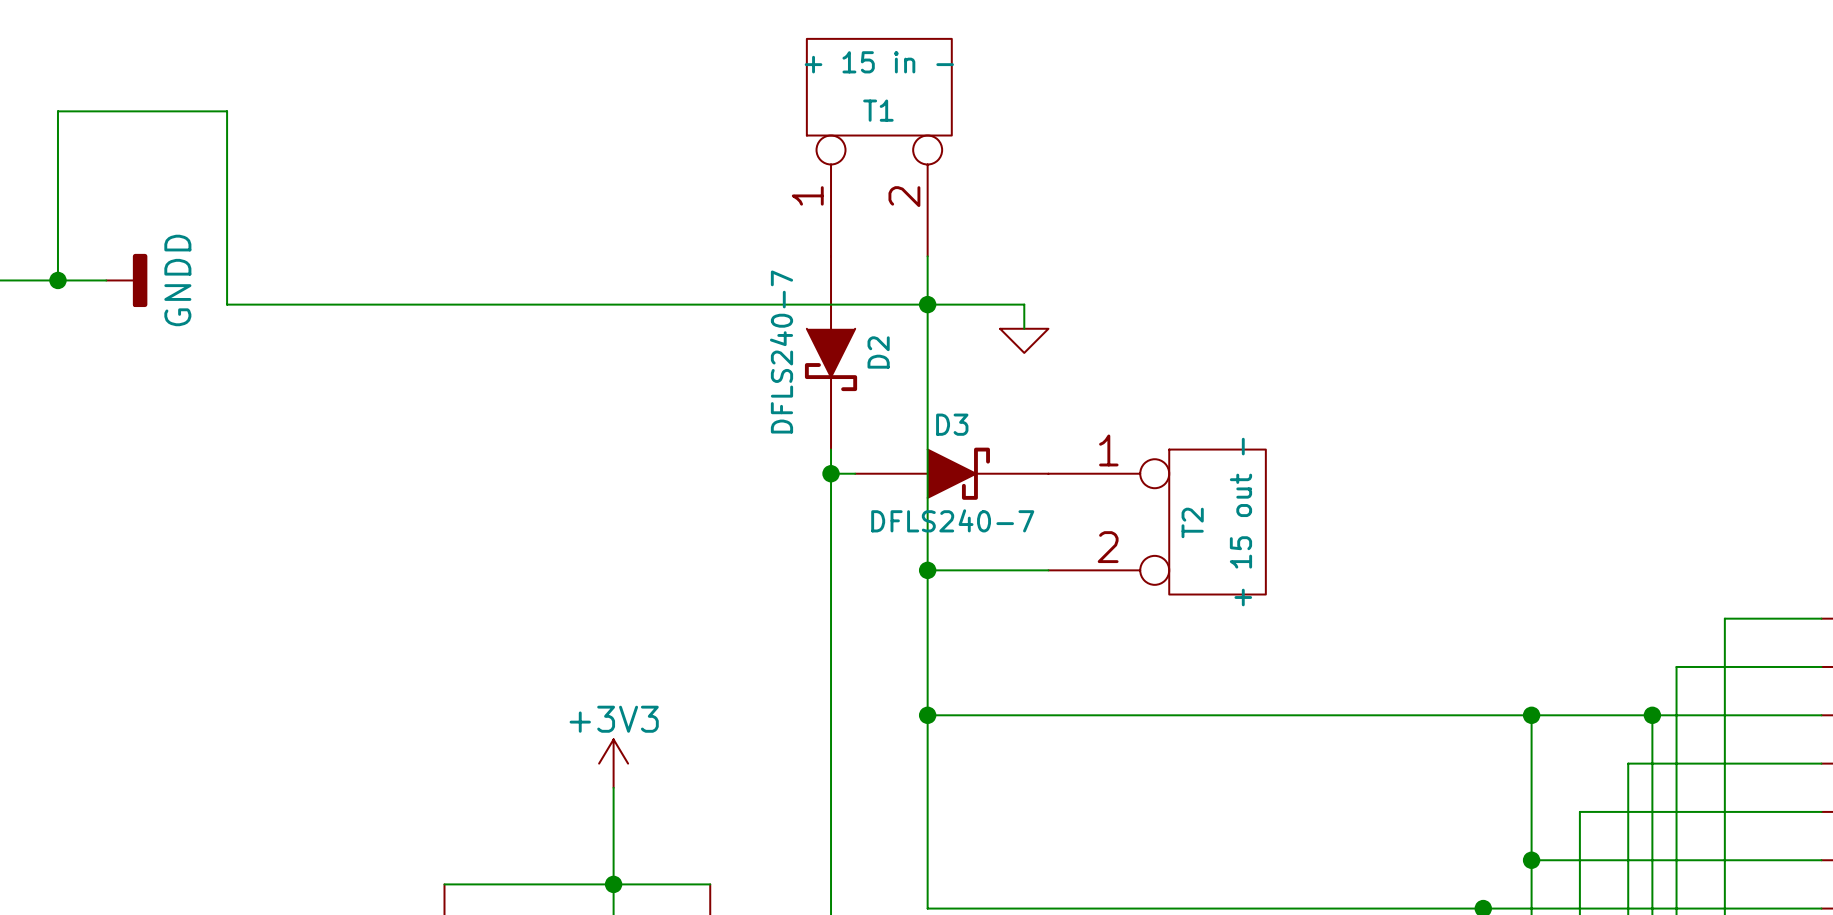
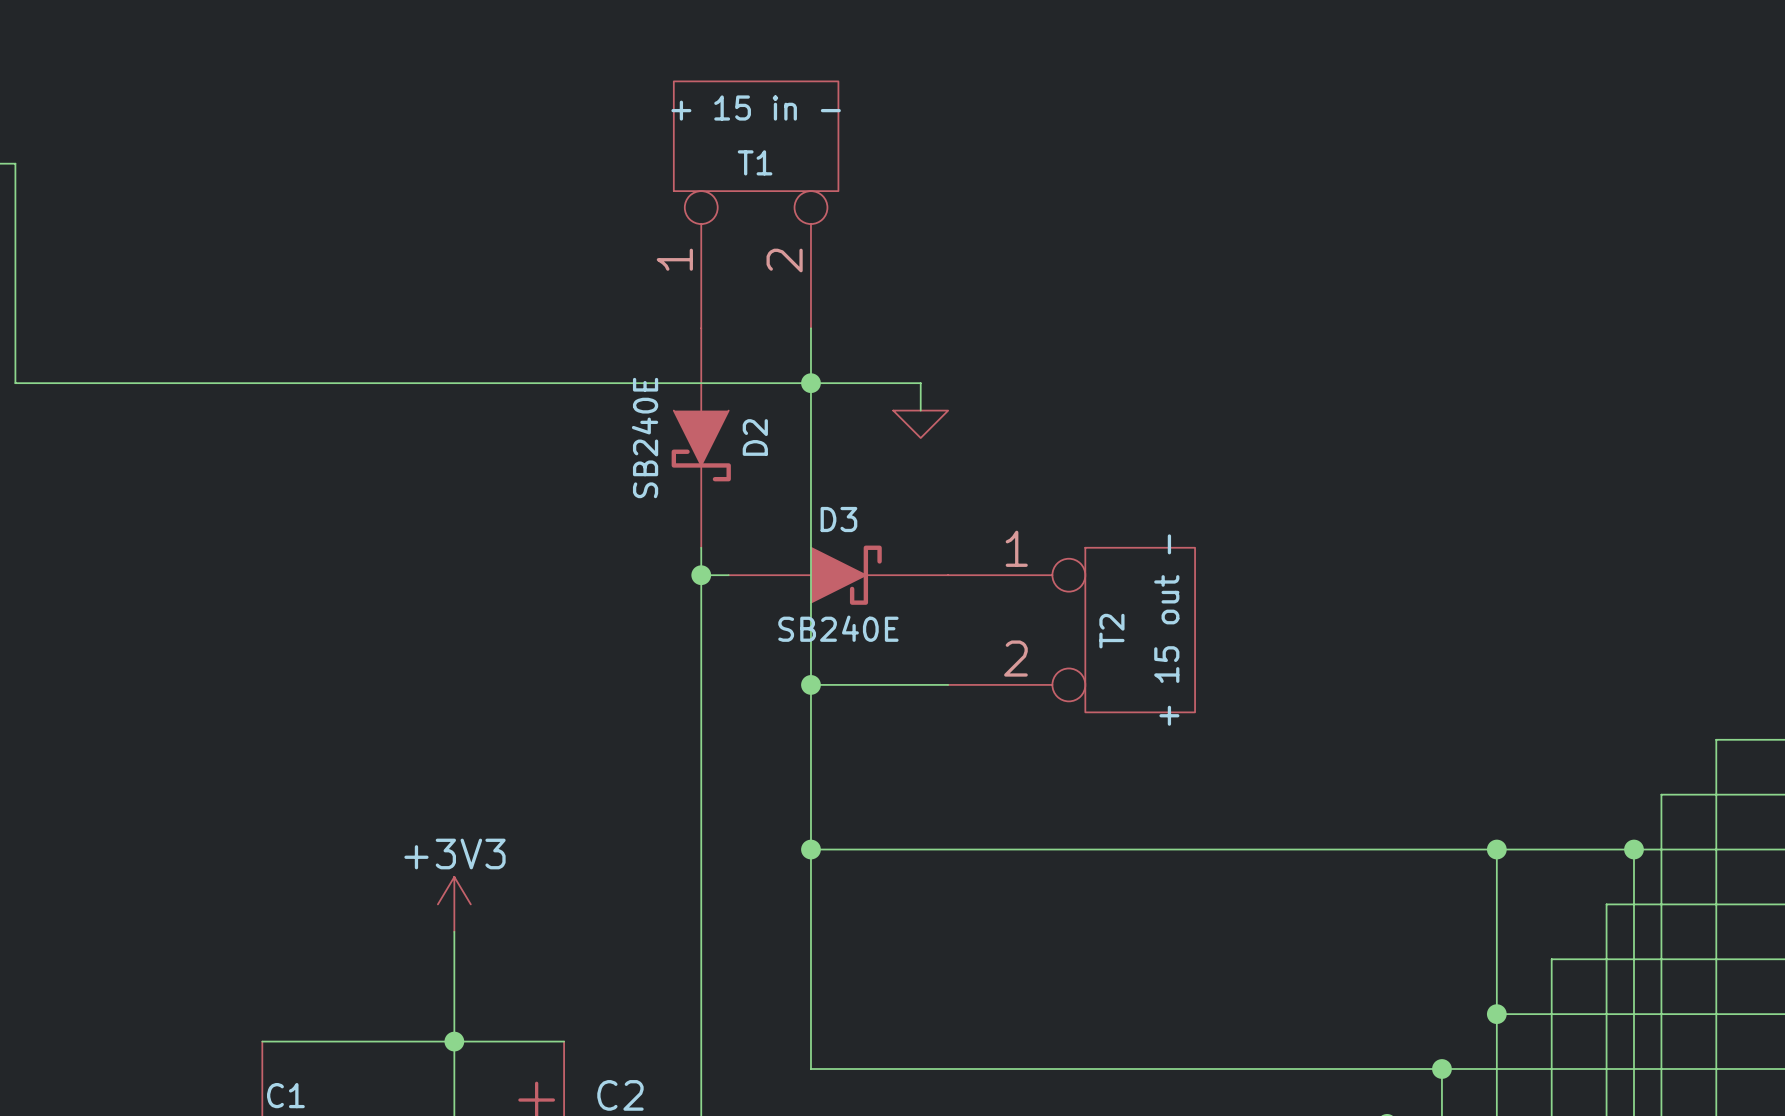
D2 value: DFLS240-7 (781, 352) -> SB240E (645, 438)
D3 value: DFLS240-7 (952, 520) -> SB240E (838, 628)

